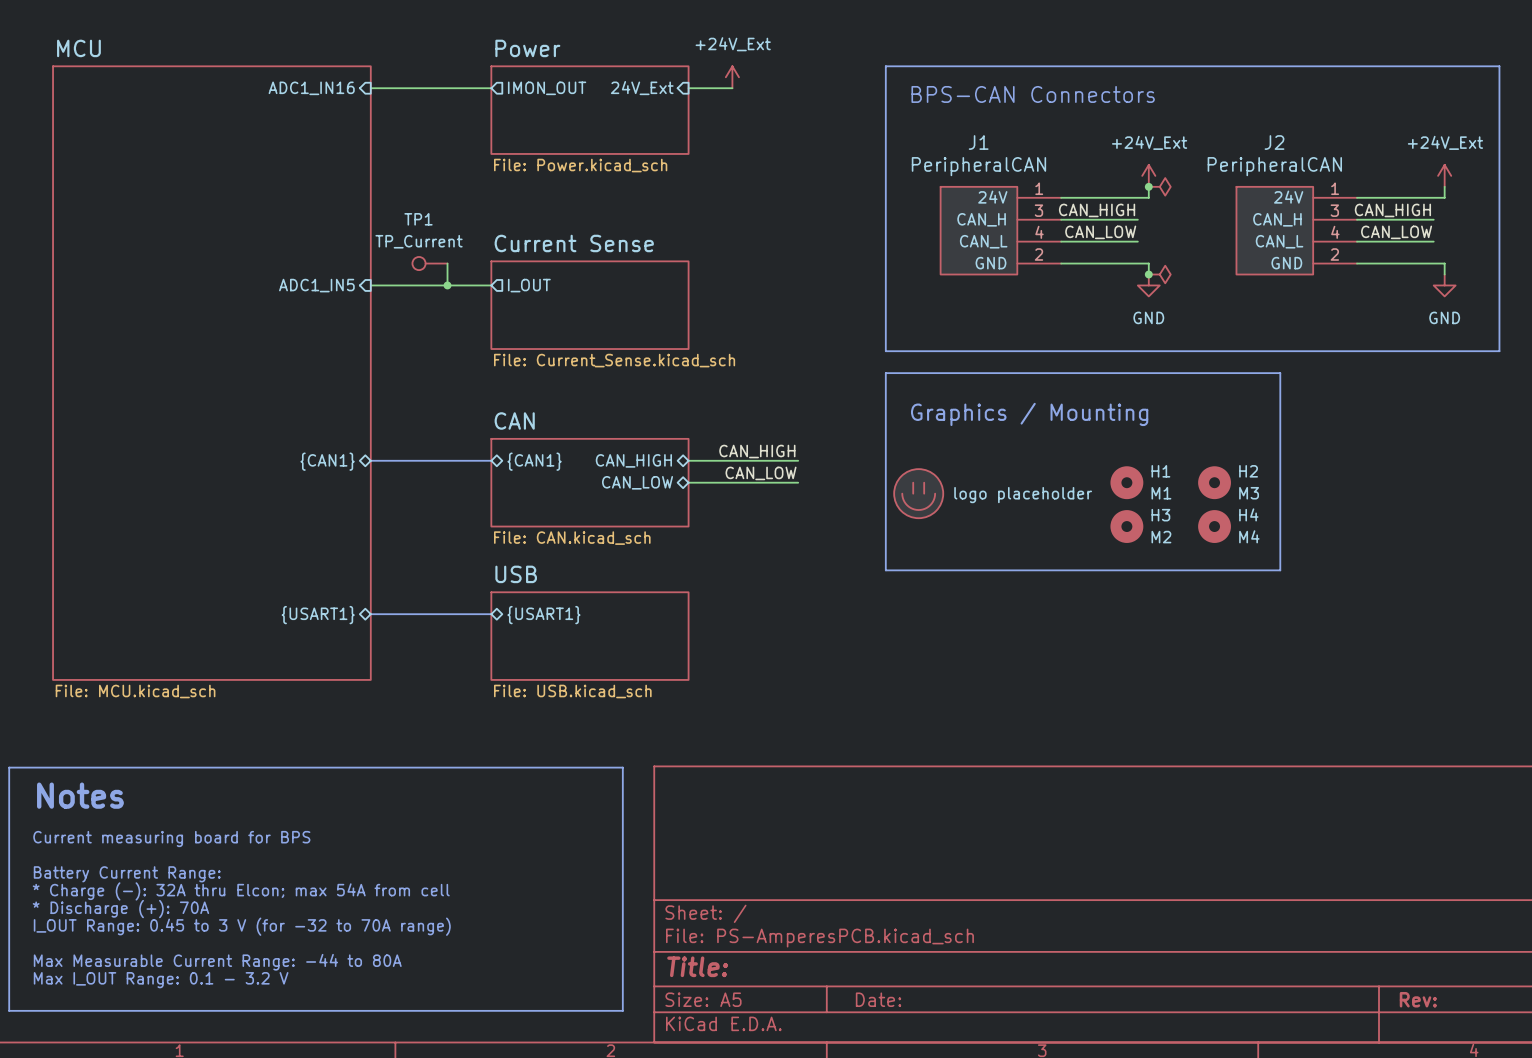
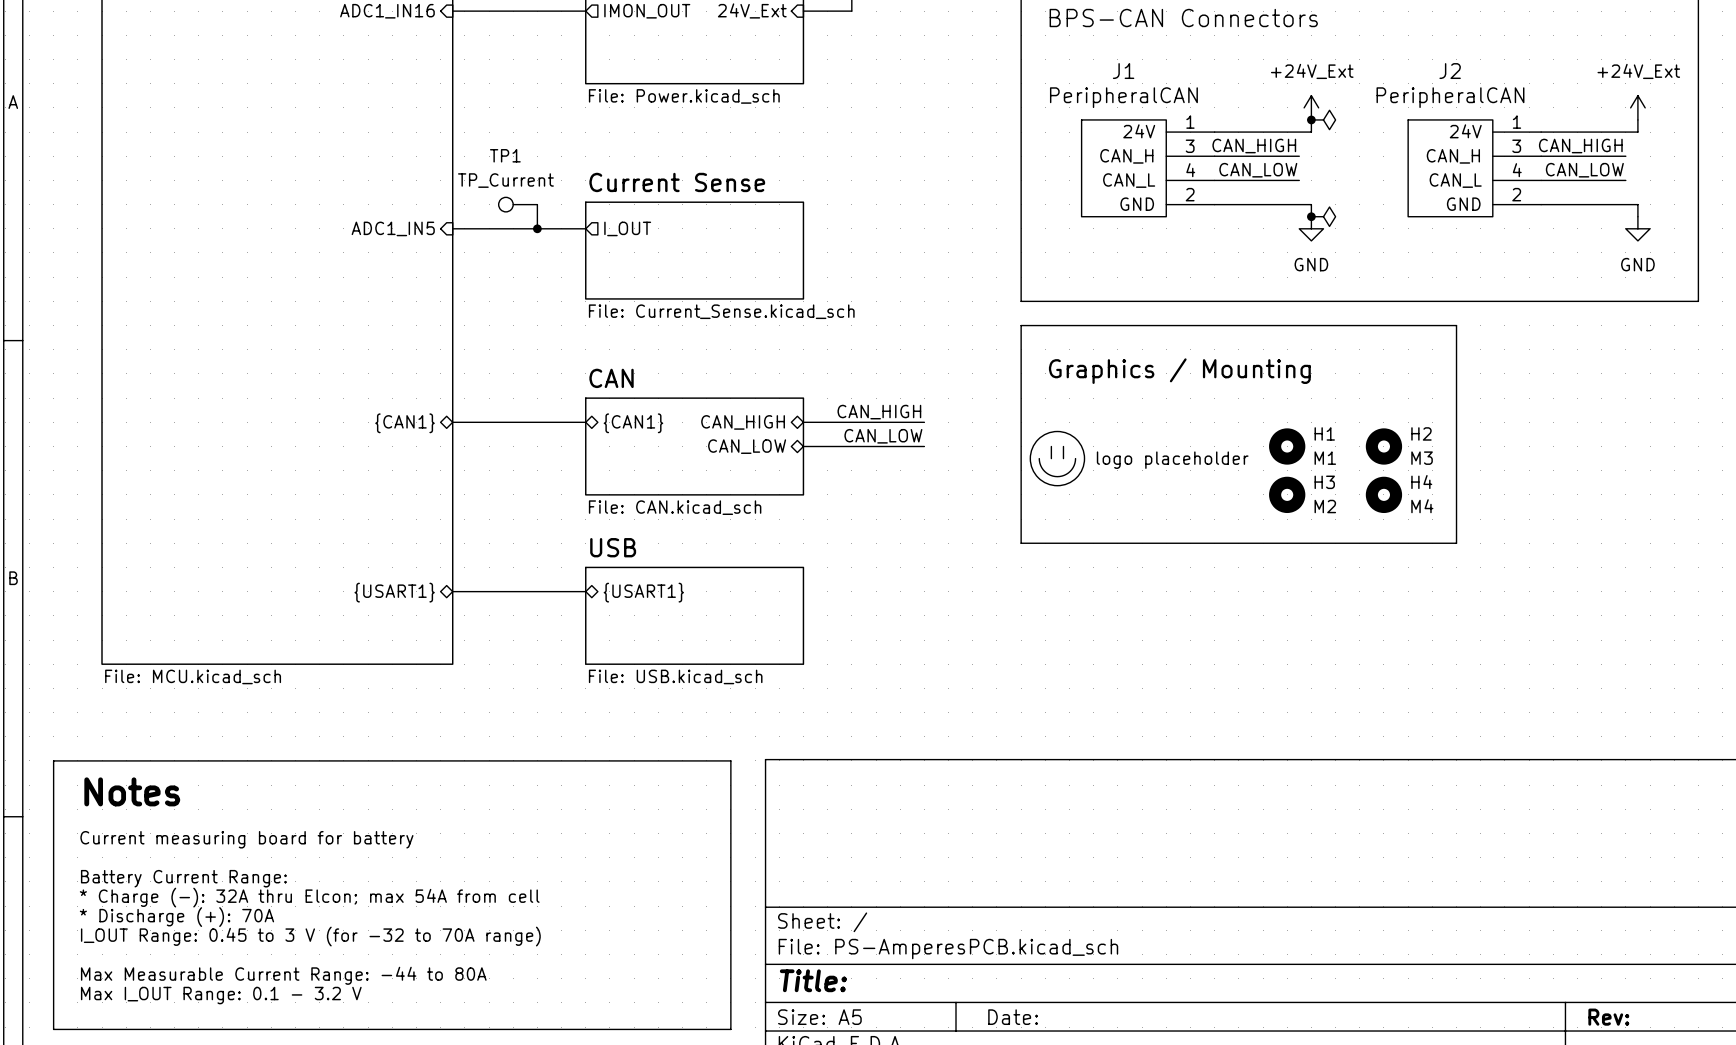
text: Current measuring board for BPS (171, 839) -> Current measuring board for battery (246, 839)

